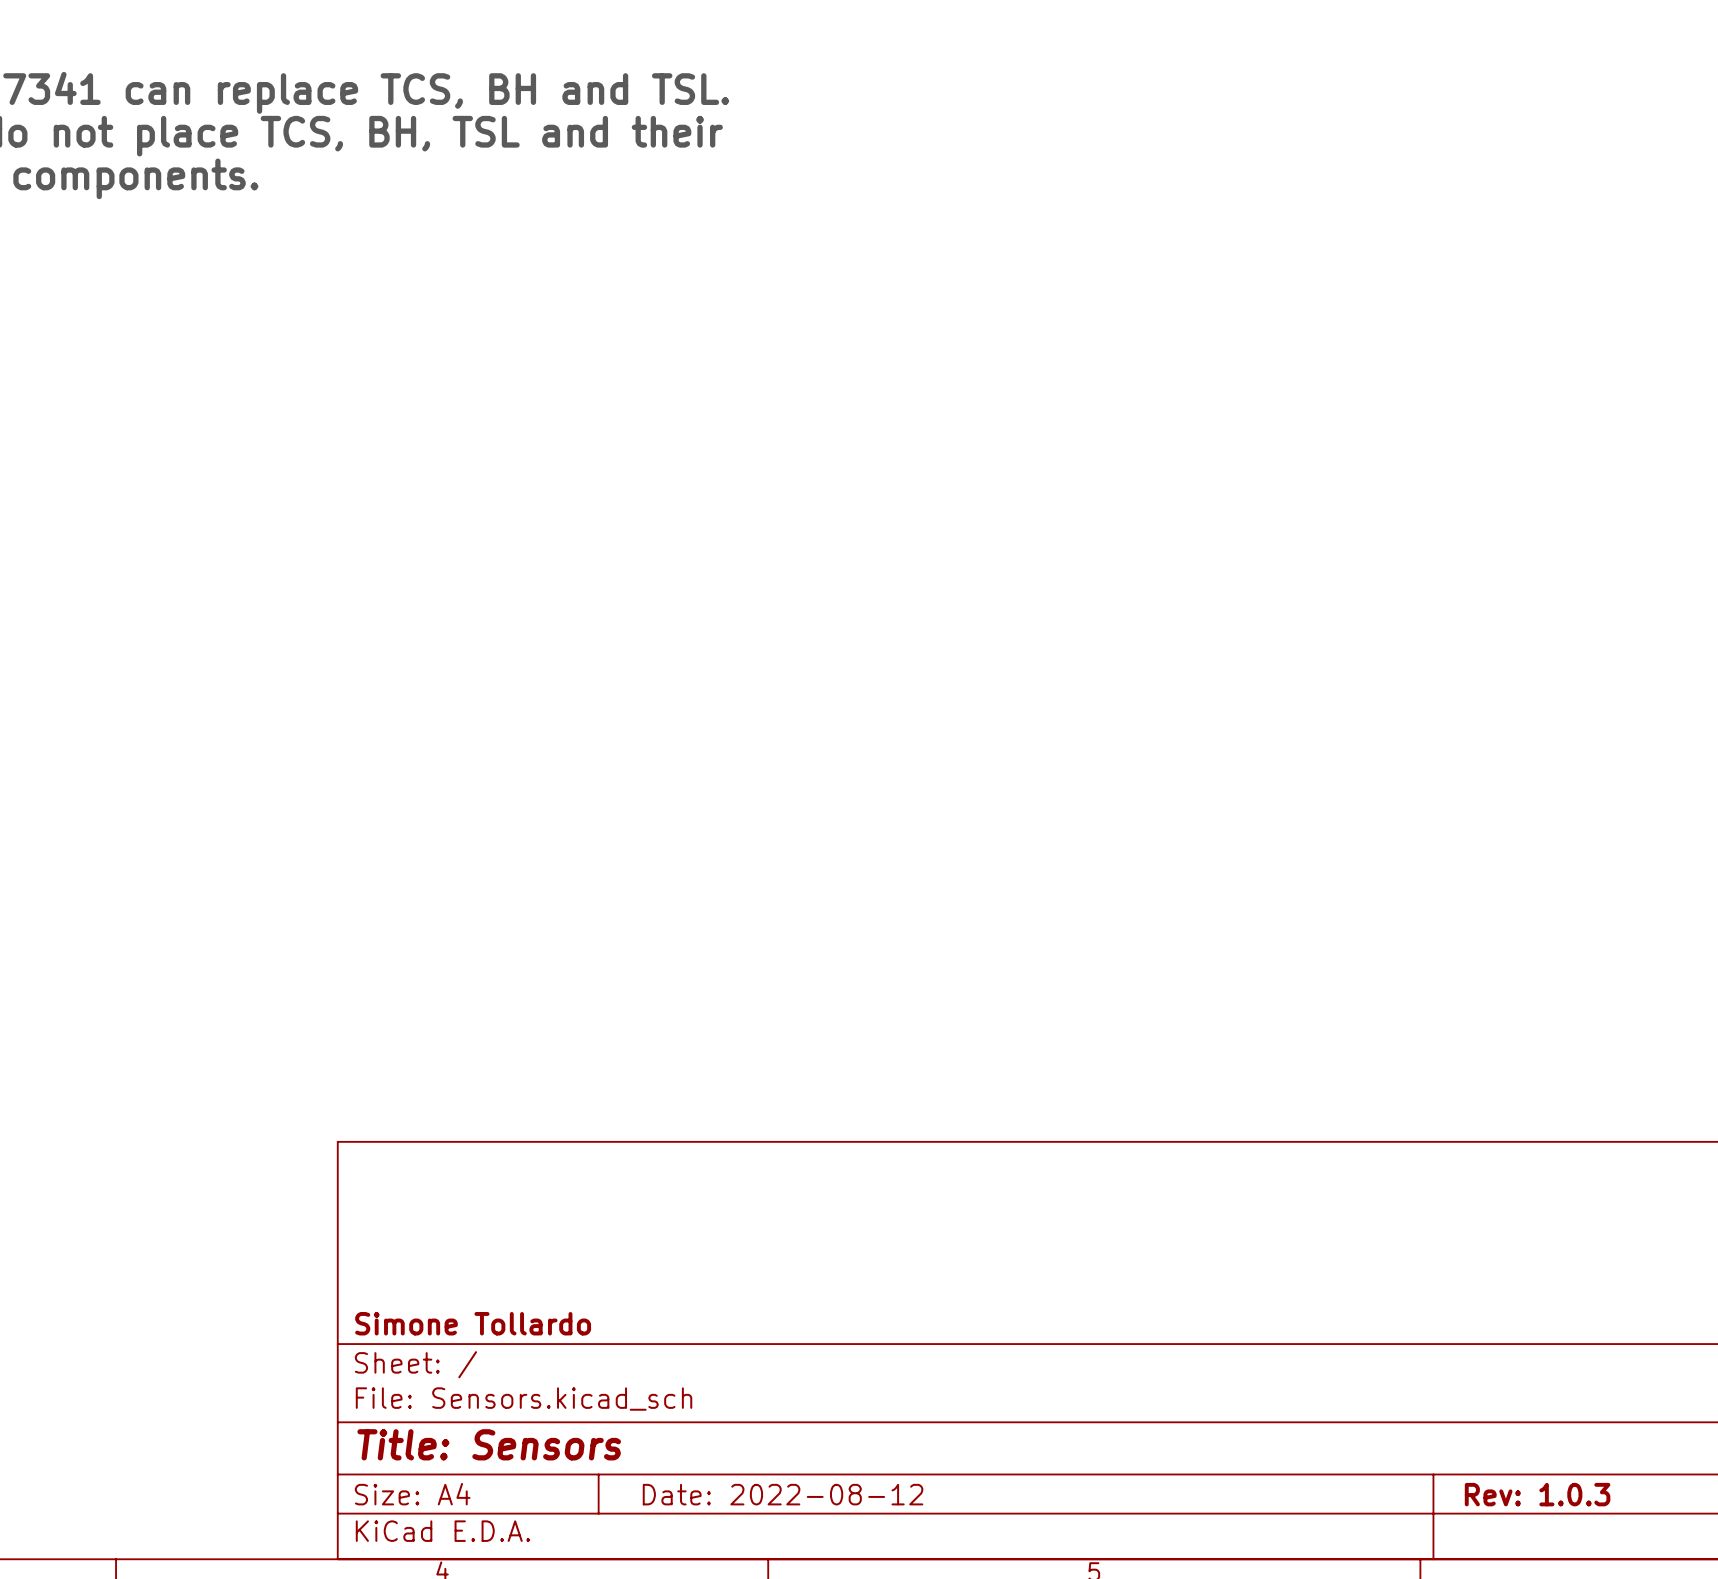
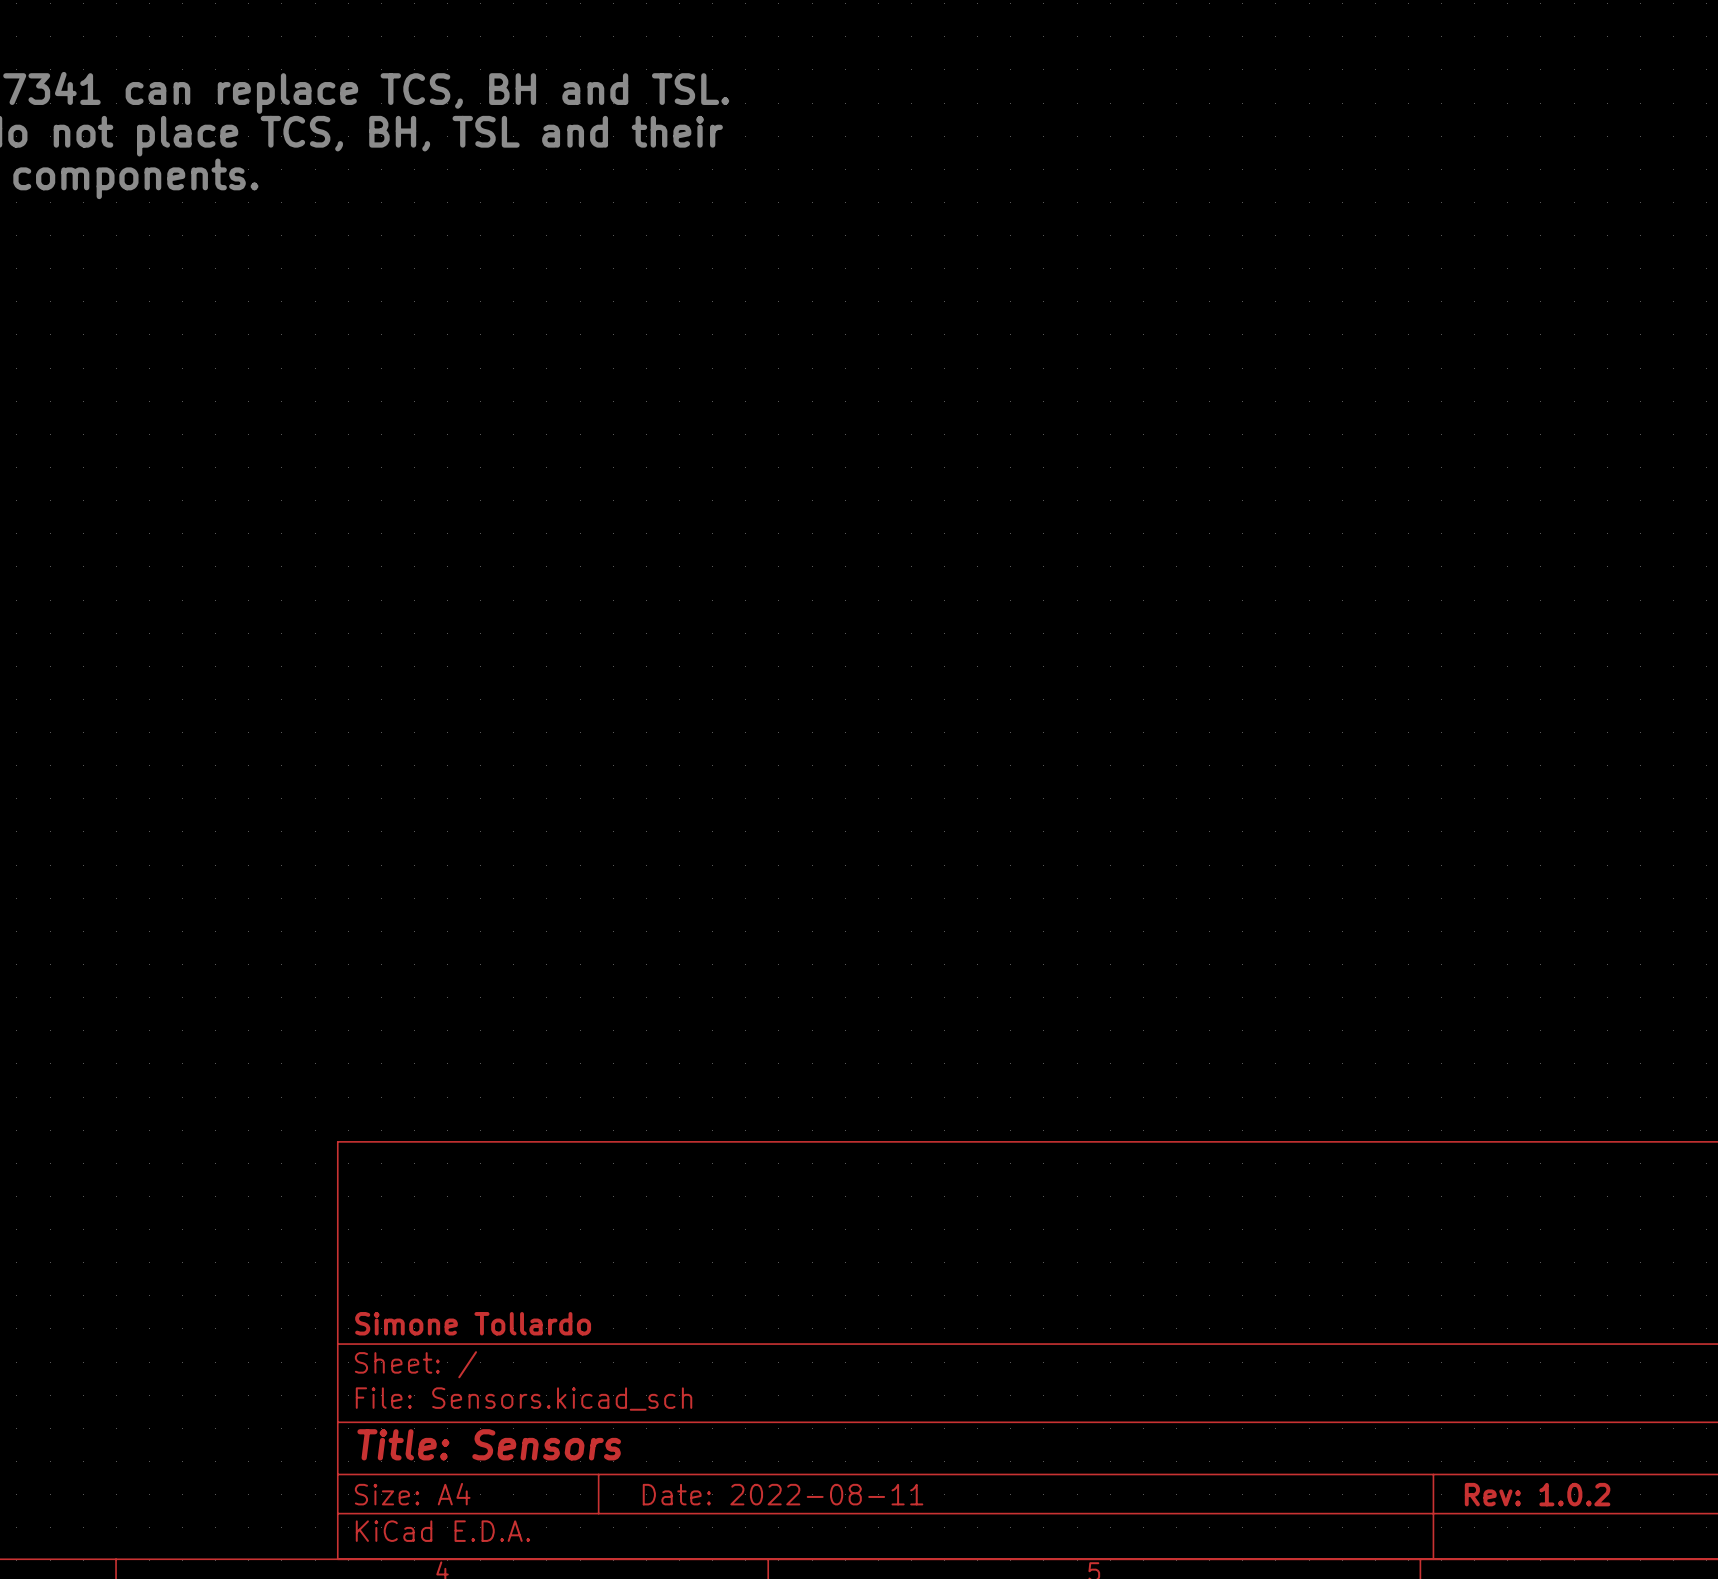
title block: Date: 2022-08-12 (783, 1494) -> Date: 2022-08-11 (783, 1494)
title block: Rev: 1.0.3 (1537, 1494) -> Rev: 1.0.2 (1537, 1494)

